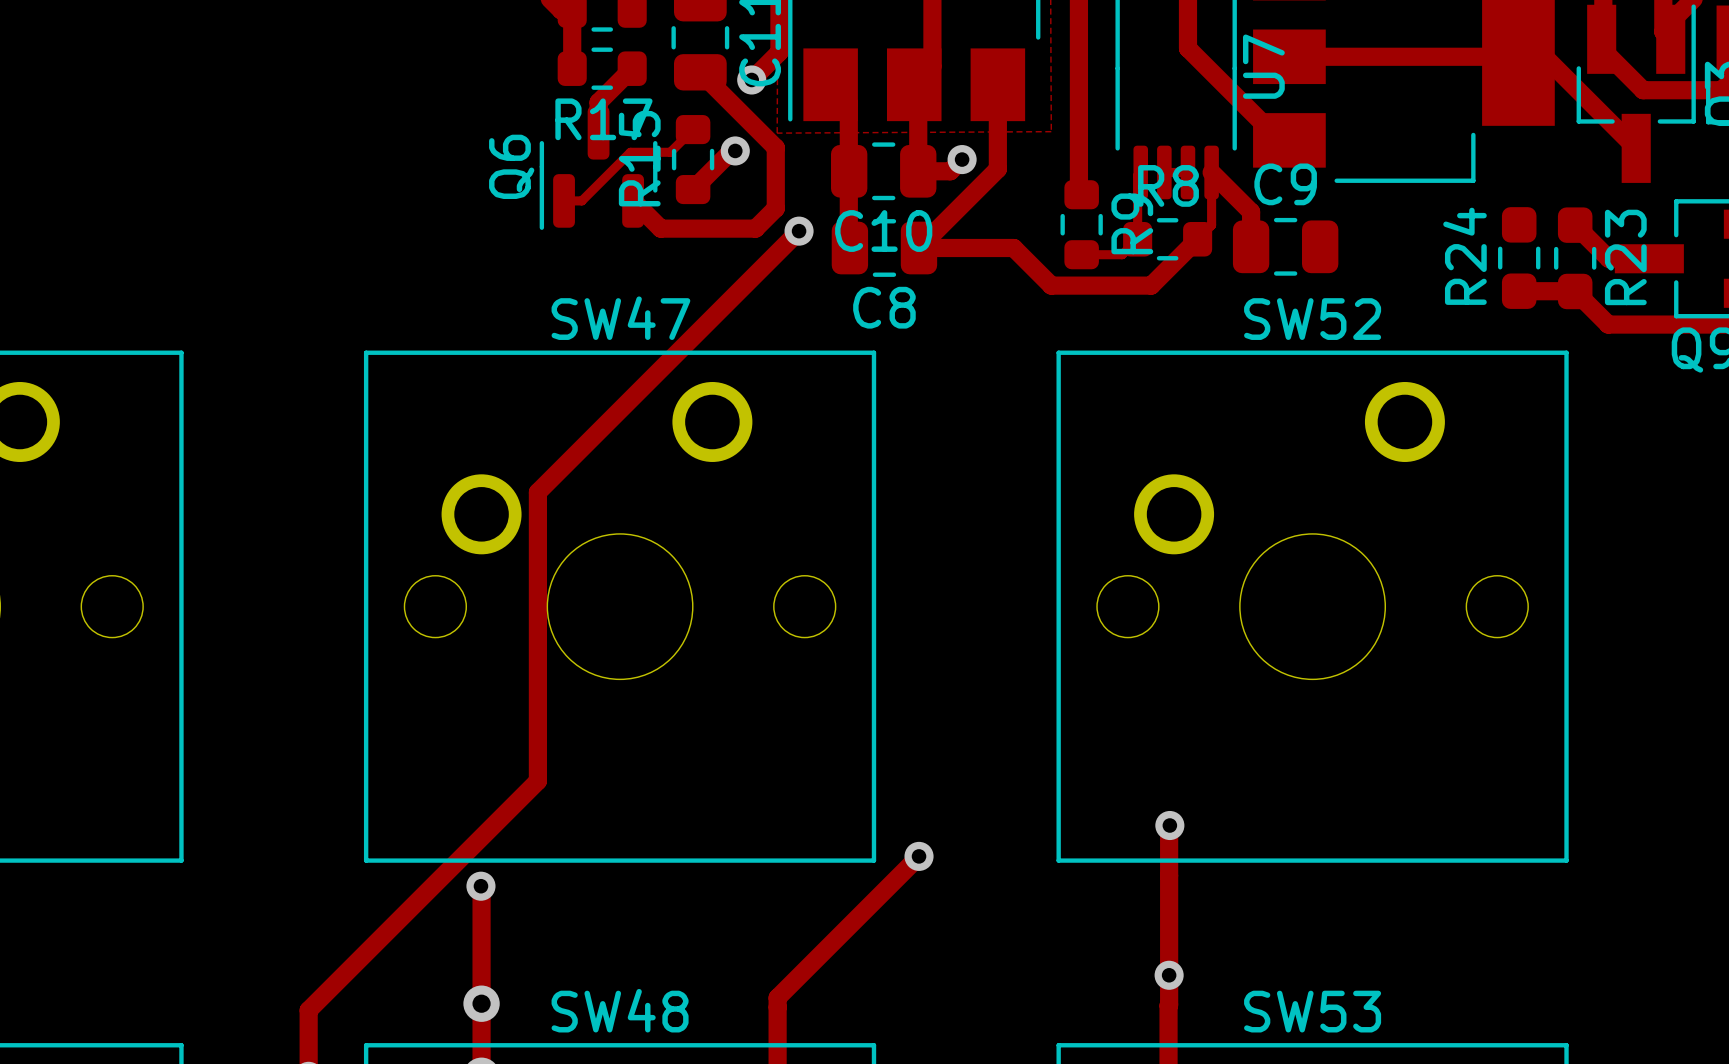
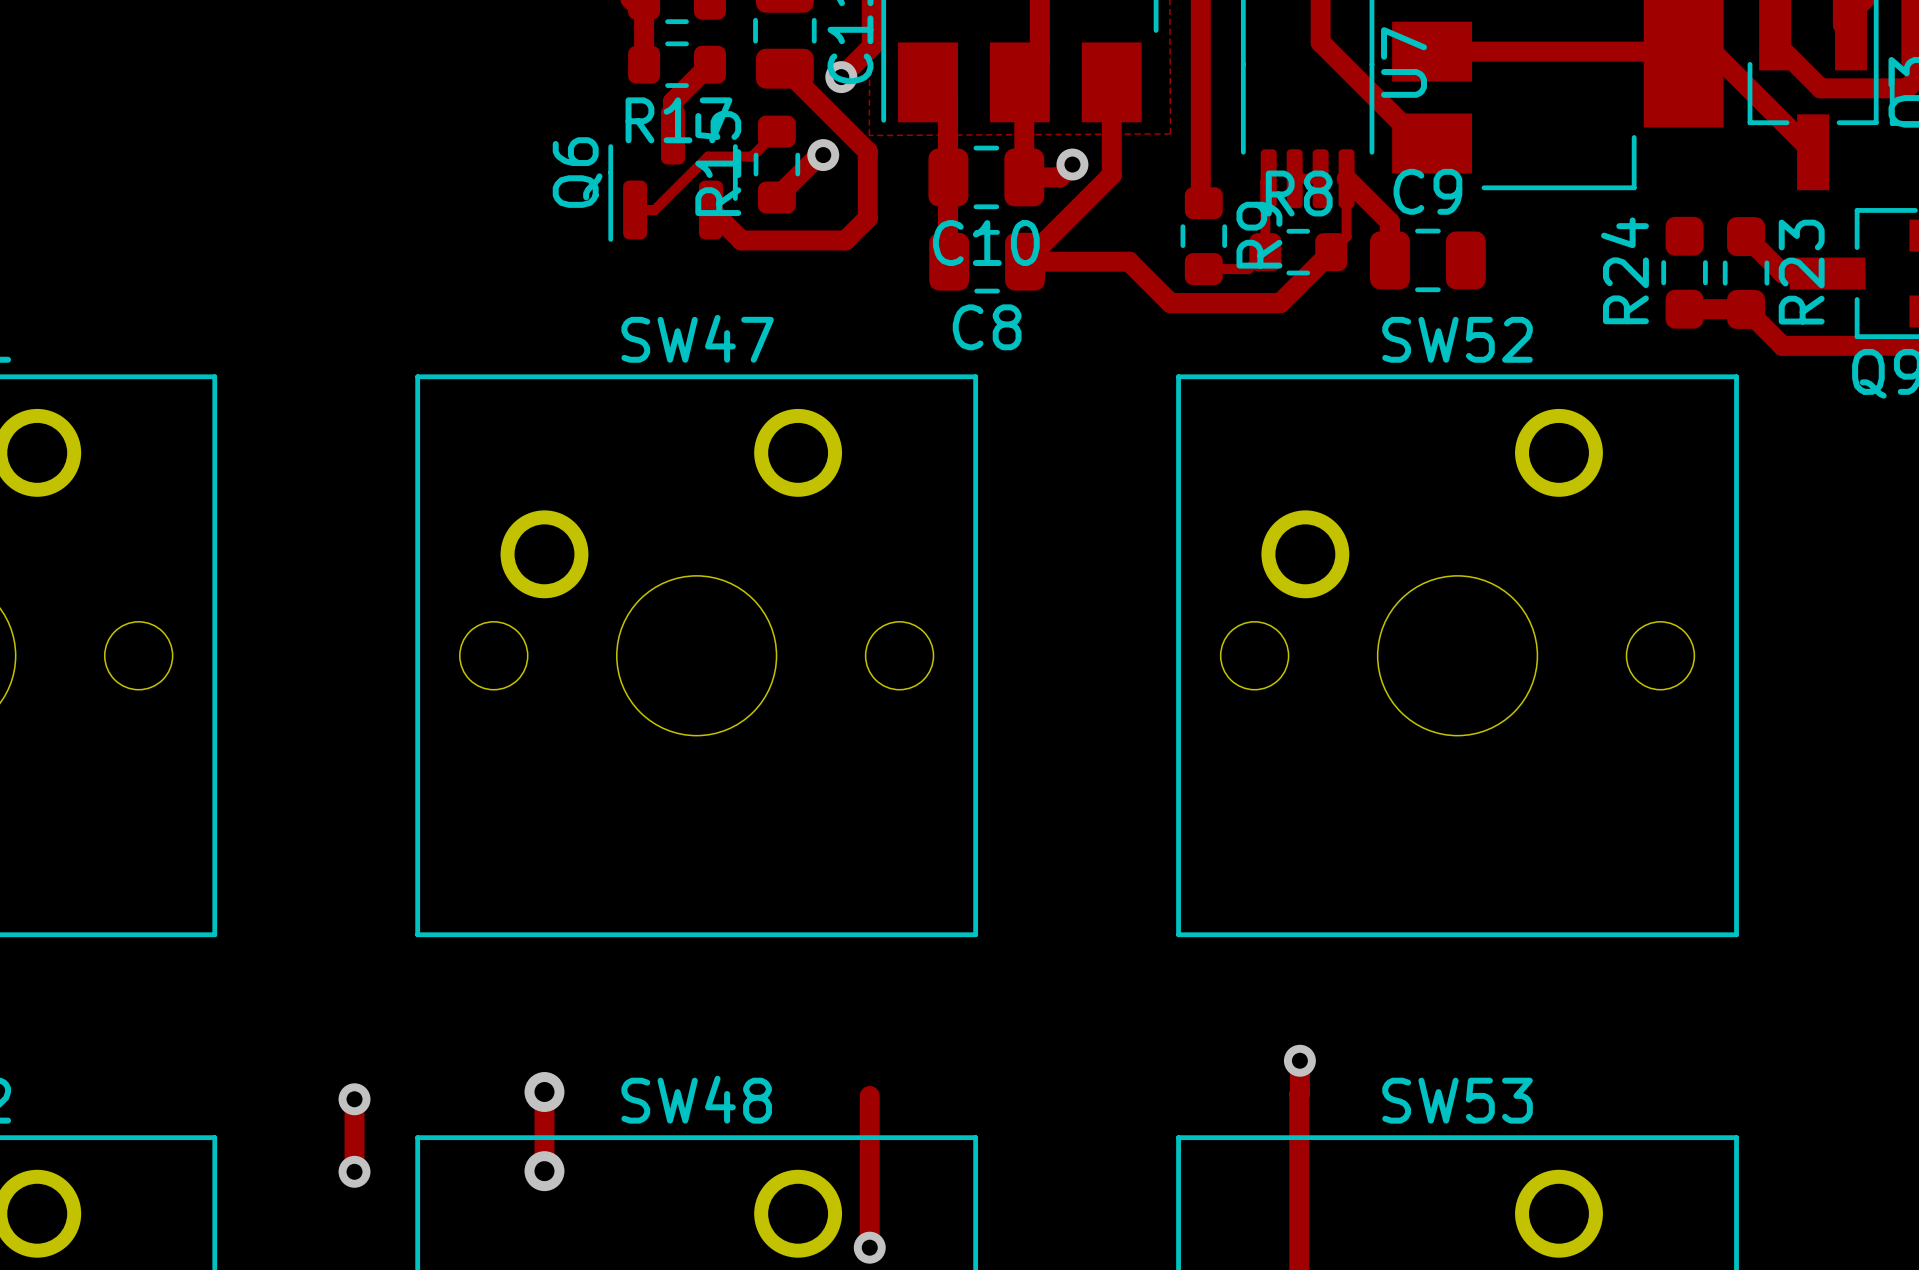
track: (799, 231) (537, 492) (537, 781) (308, 1010) -> none
via: (799, 231) -> none
track: (1169, 825) (1169, 975) -> none
via: (1169, 825) -> none
track: (919, 856) (777, 997) (777, 1007) -> none
via: (919, 856) -> none
track: (480, 886) (481, 1003) -> none
via position: (480, 886) -> (354, 1099)

